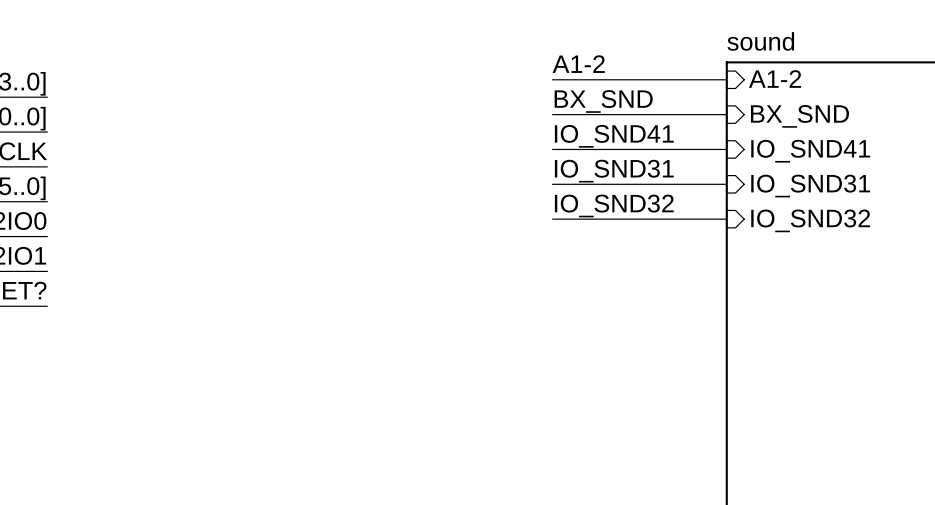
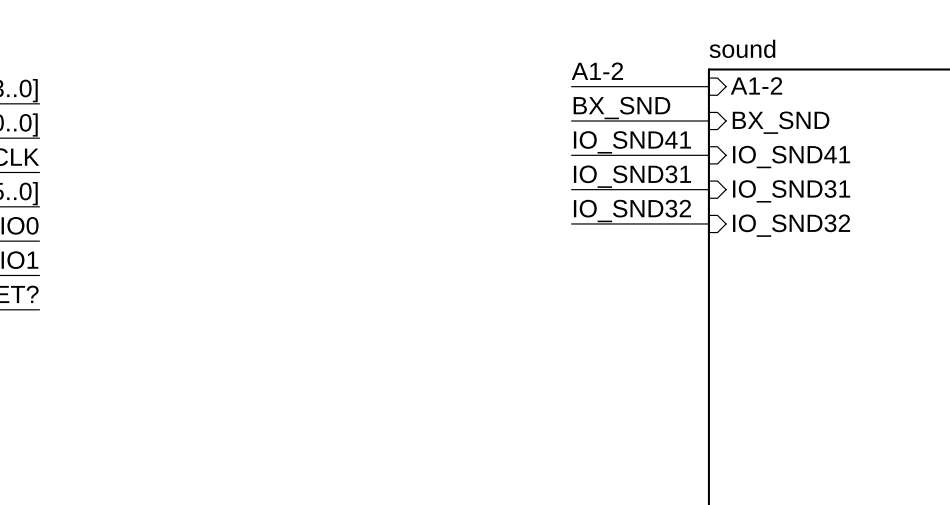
label position: A1-2 (578, 64) -> A1-2 (597, 71)
wire: (552, 79) (587, 79) -> none
label position: BX_SND (603, 101) -> BX_SND (621, 108)
wire: (552, 114) (587, 114) -> none
label position: IO_SND41 (614, 136) -> IO_SND41 (632, 142)
wire: (552, 149) (587, 149) -> none
label position: IO_SND31 (614, 171) -> IO_SND31 (632, 176)
wire: (552, 184) (587, 184) -> none
label position: IO_SND32 (614, 205) -> IO_SND32 (632, 211)
wire: (552, 219) (587, 219) -> none

